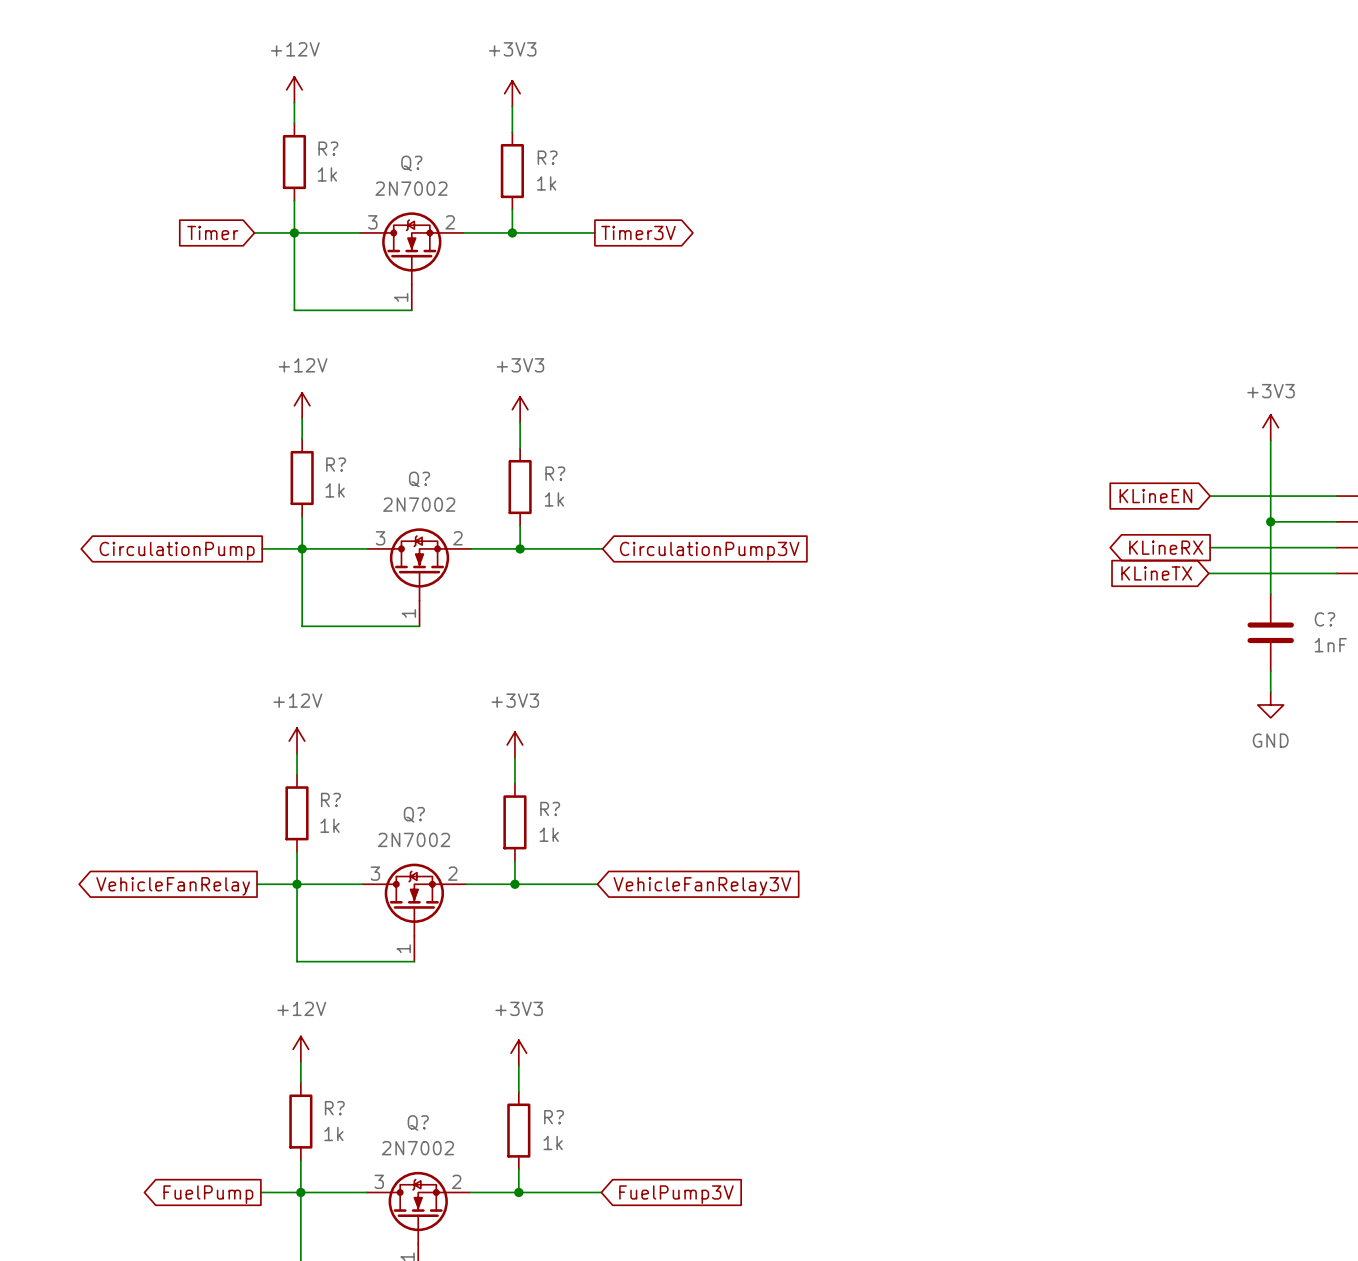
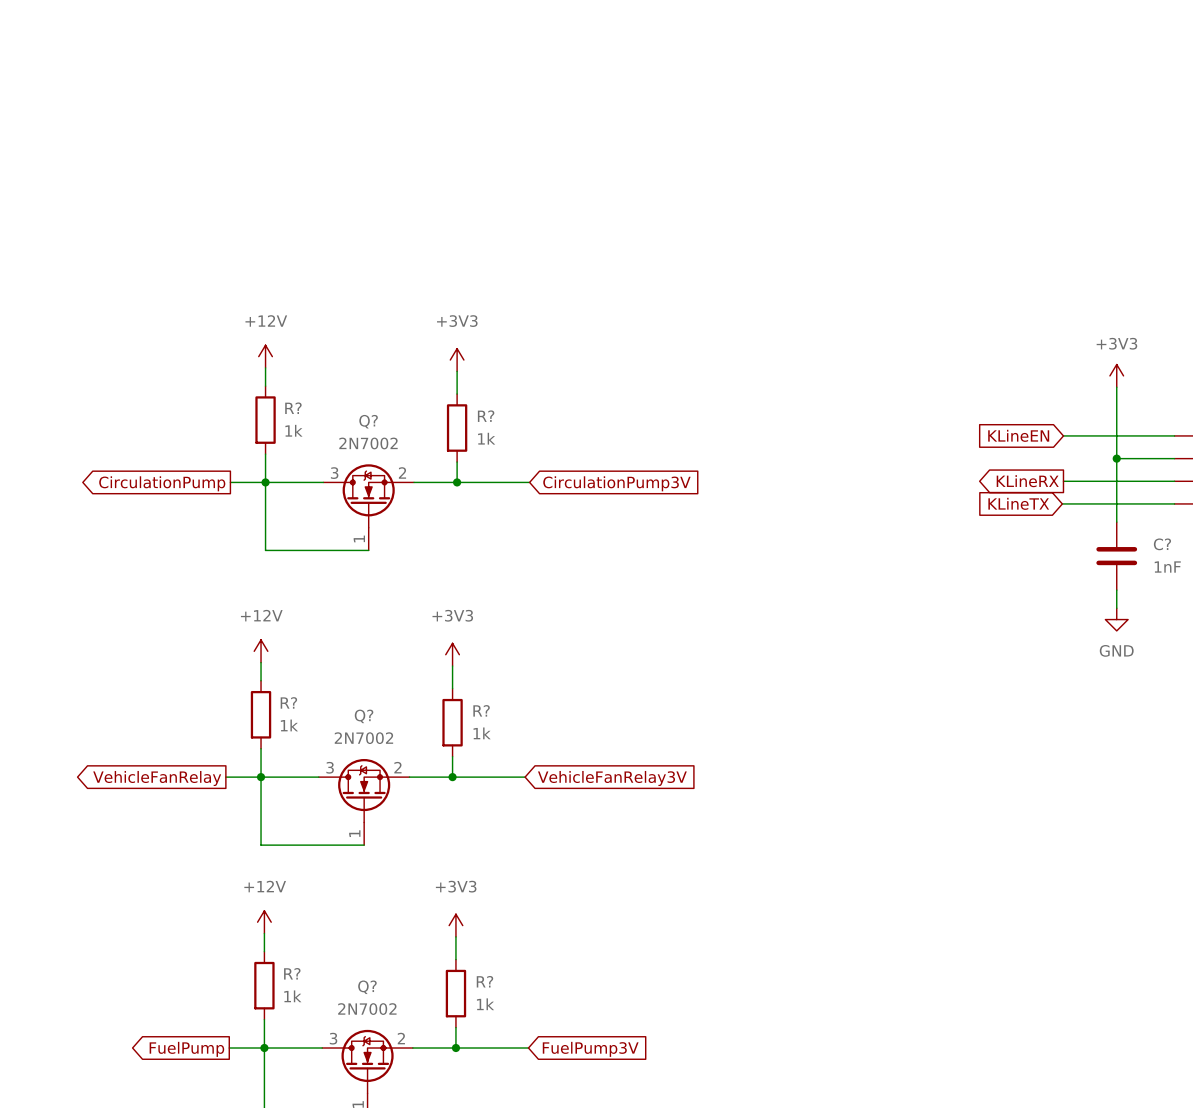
power symbol: +12V (294, 89) -> none
power symbol: +3V3 (512, 93) -> none
wire: (294, 102) (294, 123) -> none
wire: (512, 106) (512, 132) -> none
R?: 1k (294, 162) -> none
R?: 1k (512, 171) -> none
wire: (294, 200) (294, 310) (411, 310) -> none
wire: (512, 209) (512, 232) -> none
global label: Timer (212, 232) -> none
wire: (254, 232) (360, 232) -> none
junction: (294, 232) -> none
wire: (463, 232) (594, 232) -> none
junction: (512, 232) -> none
global label: Timer3V (638, 232) -> none
Q?: 2N7002 (411, 261) -> none

